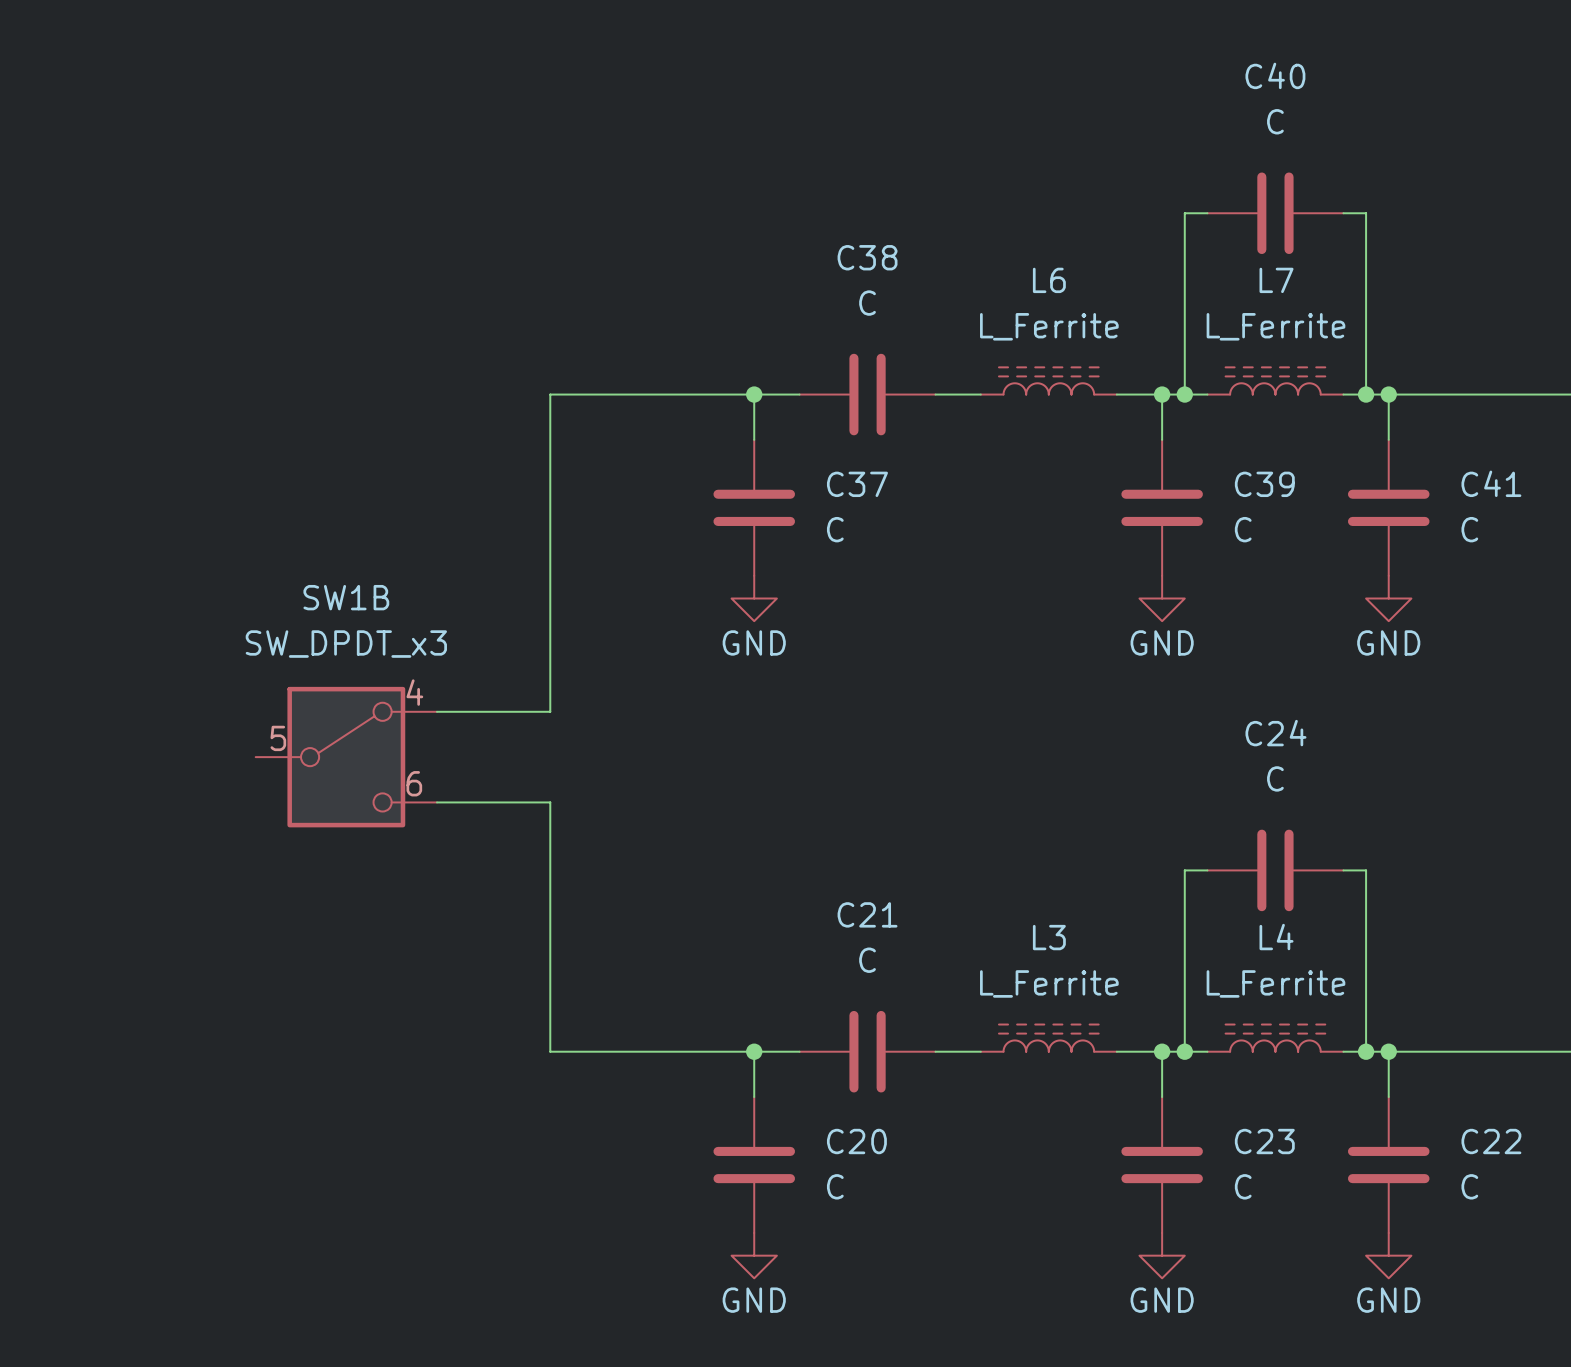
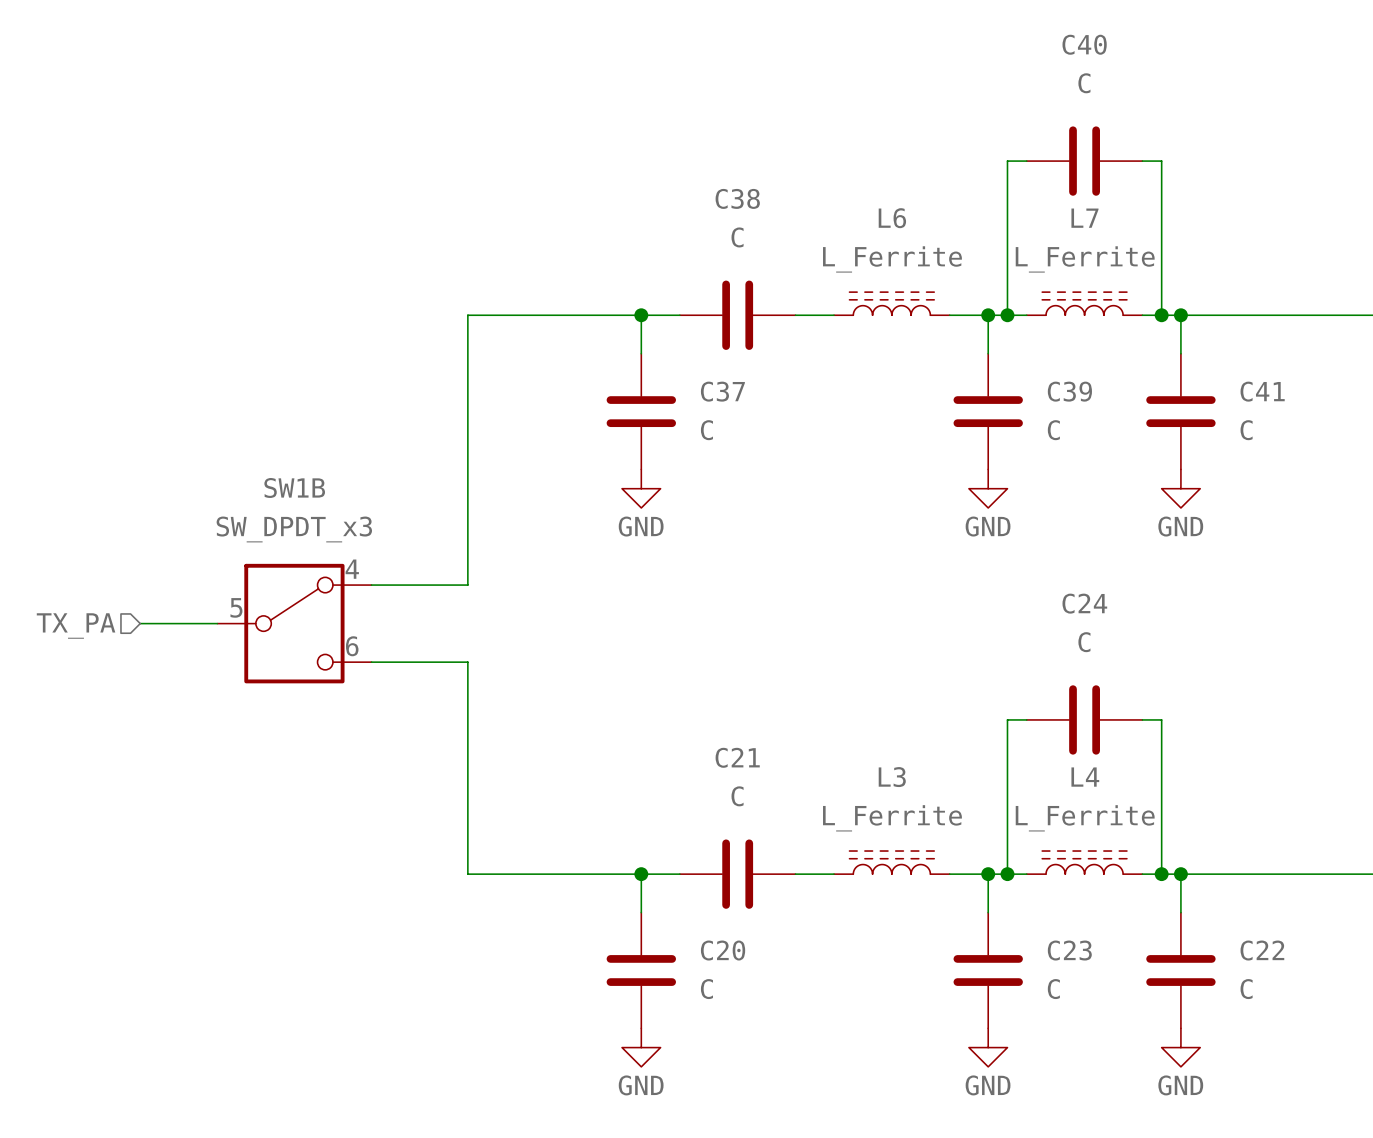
hierarchical label: none -> TX_PA (76, 626)
wire: none -> (140, 623) (217, 623)

